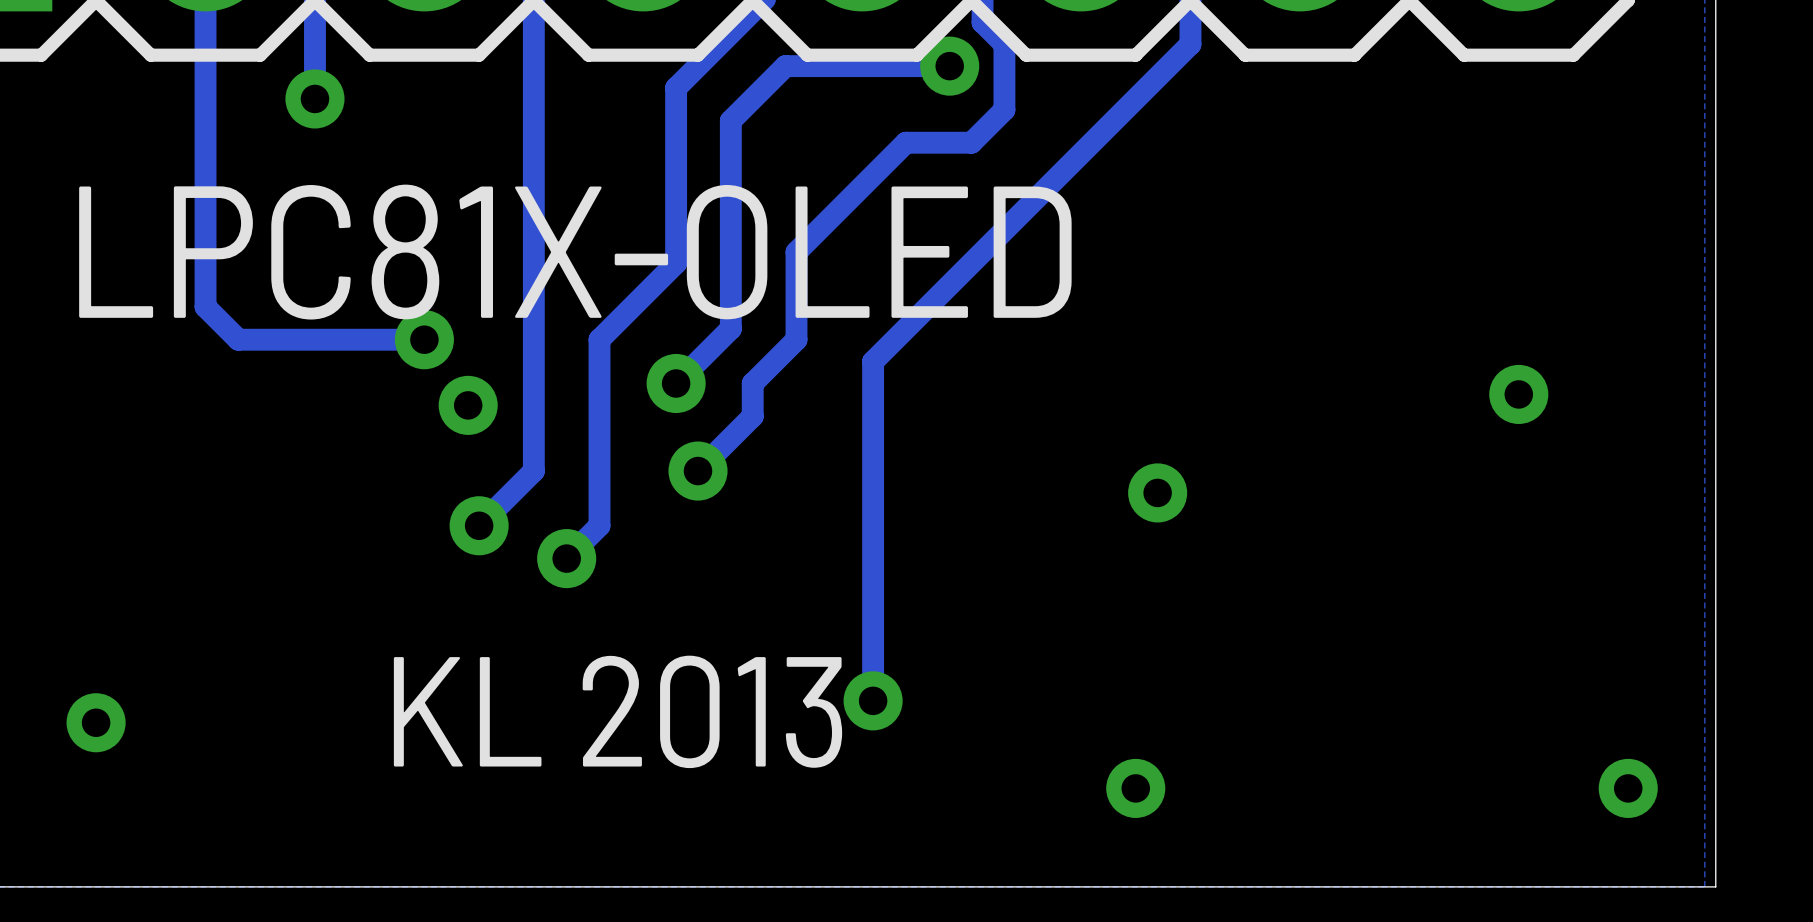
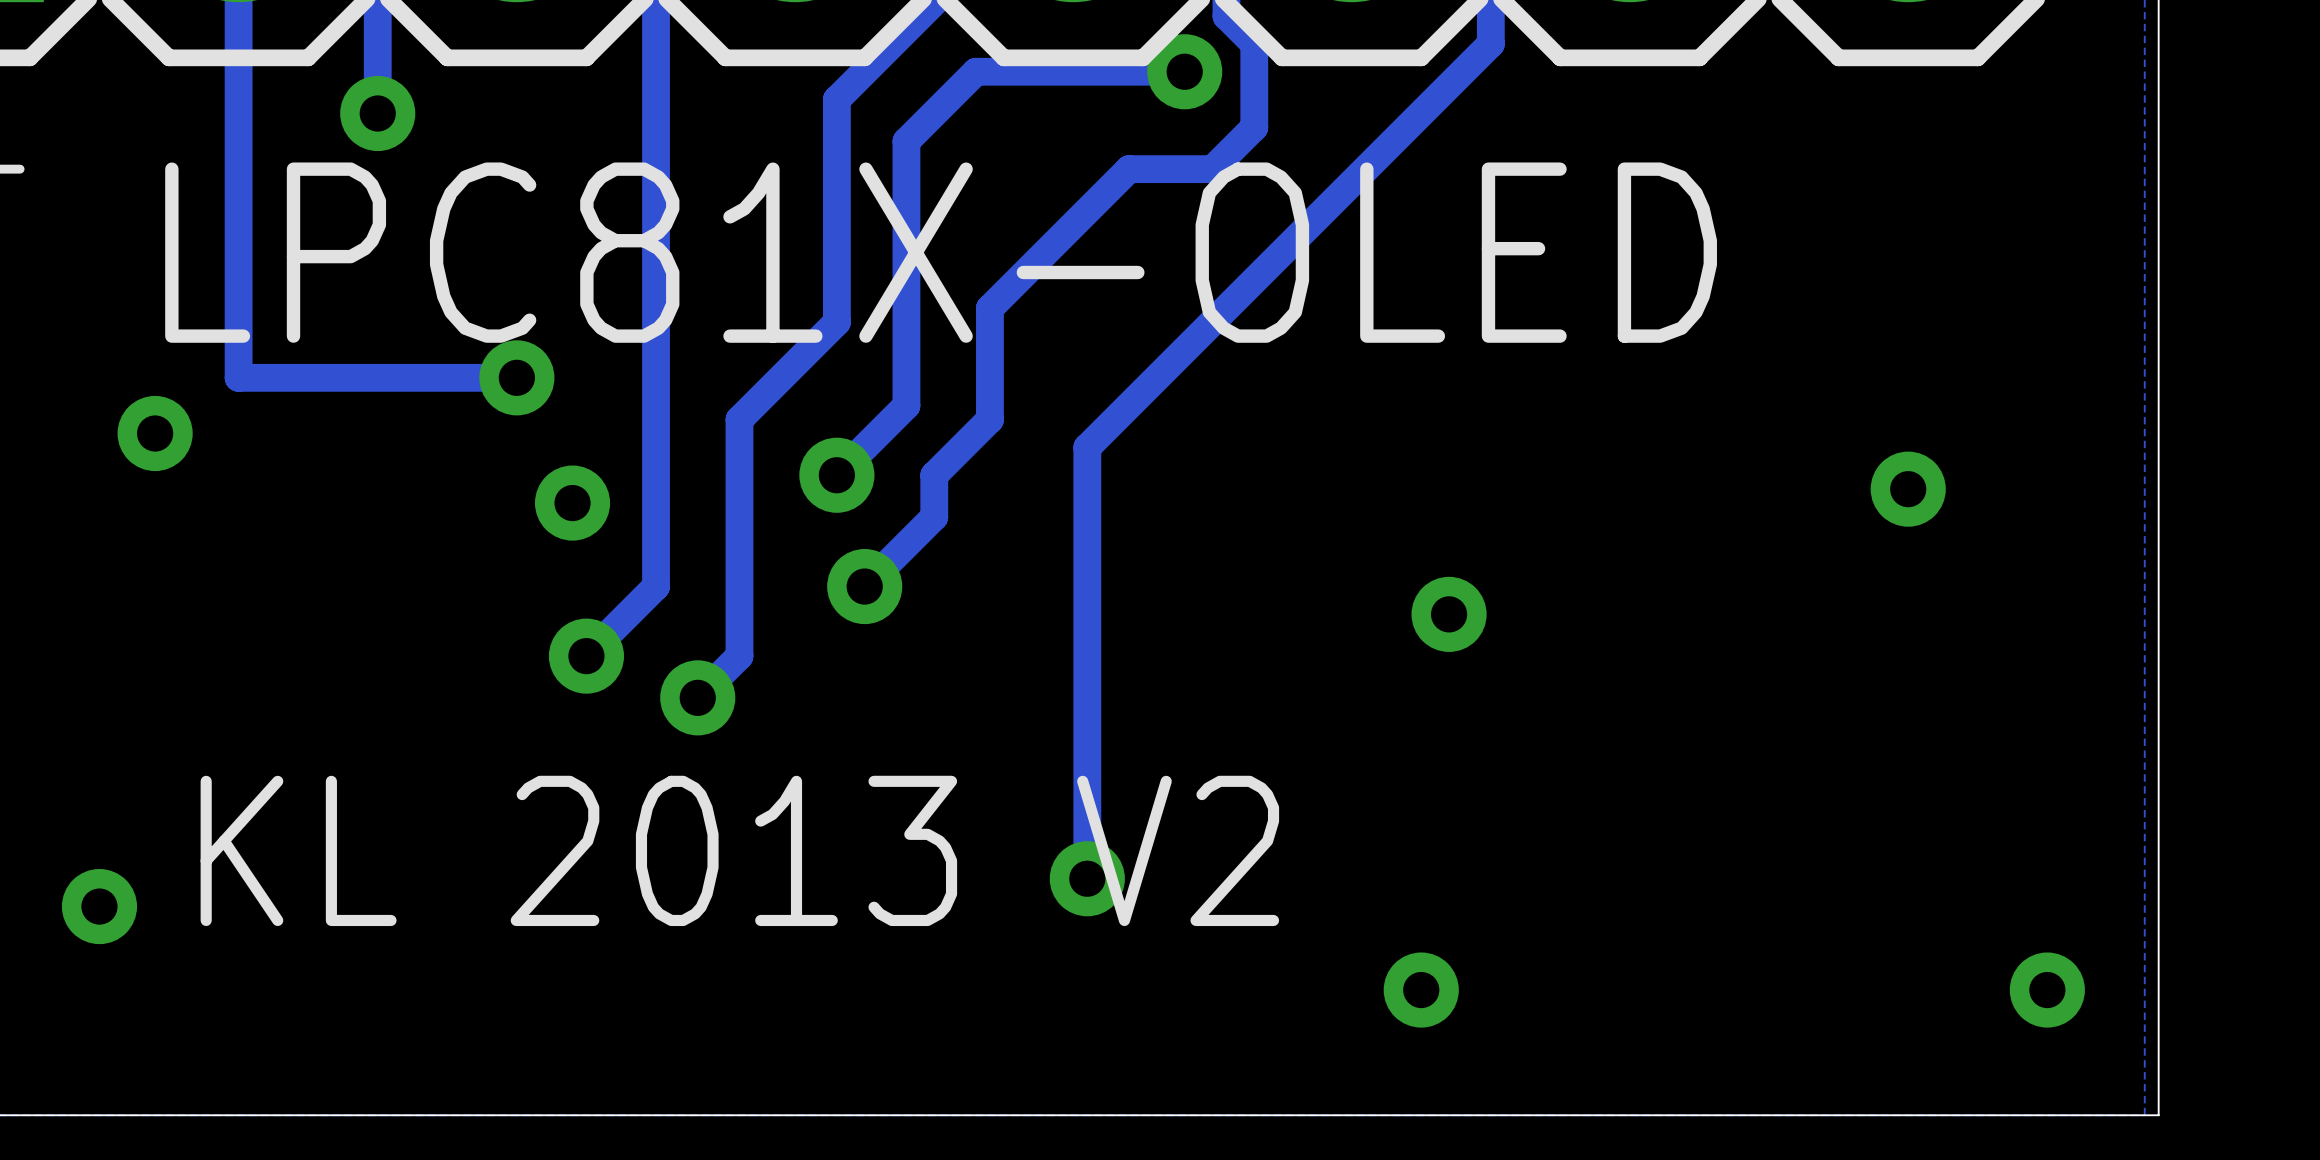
text position: LPC81X-OLED (575, 252) -> LPC81X-OLED (941, 252)
track: (205, 306) (238, 339) (424, 339) -> (238, 377) (516, 377)
via position: (424, 339) -> (516, 377)
via: none -> (155, 433)
text: KL 2013 (618, 711) -> KL 2013 V2 (739, 850)

